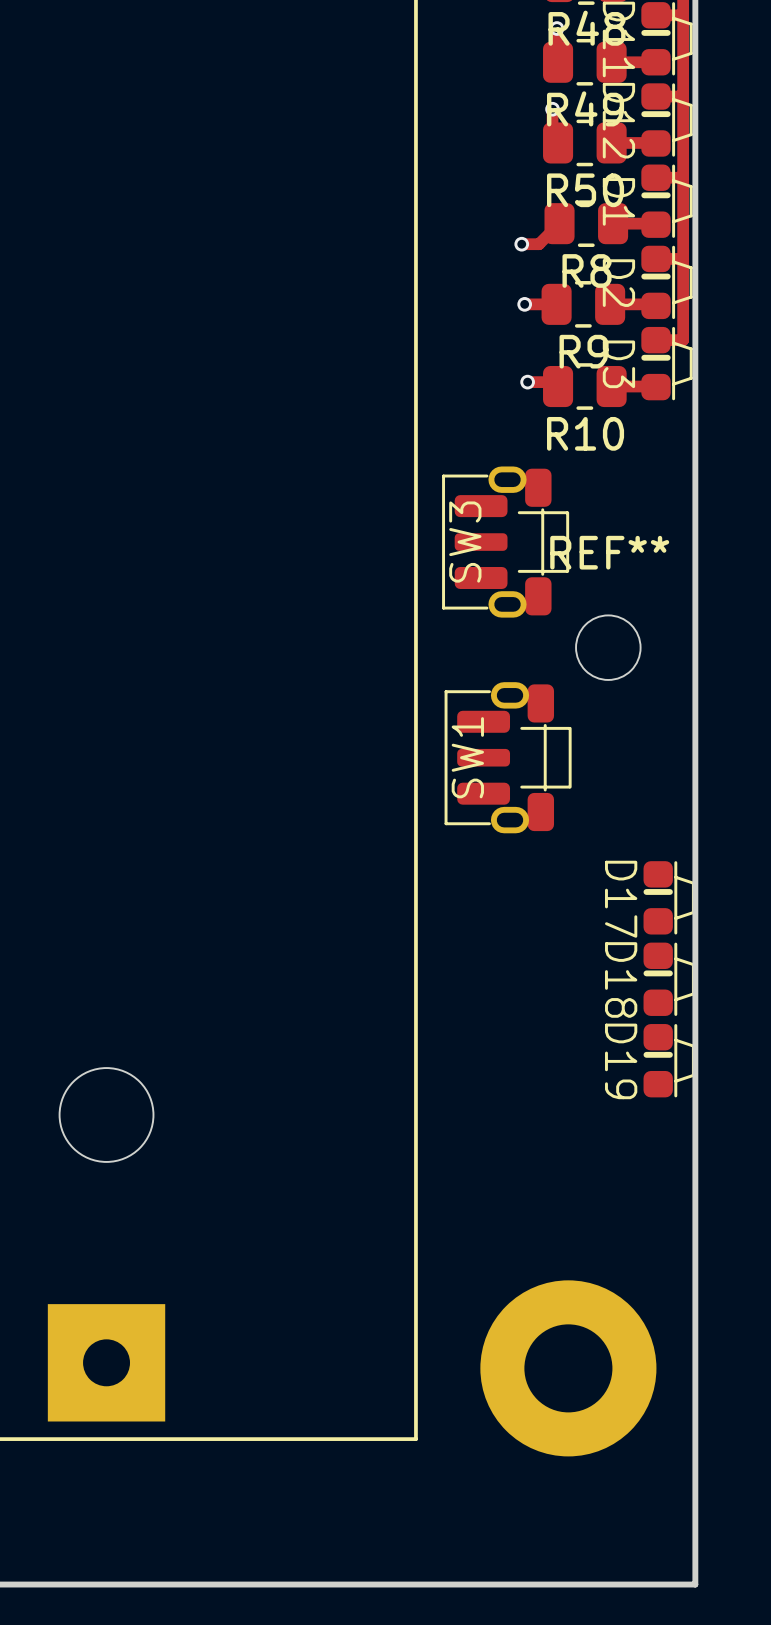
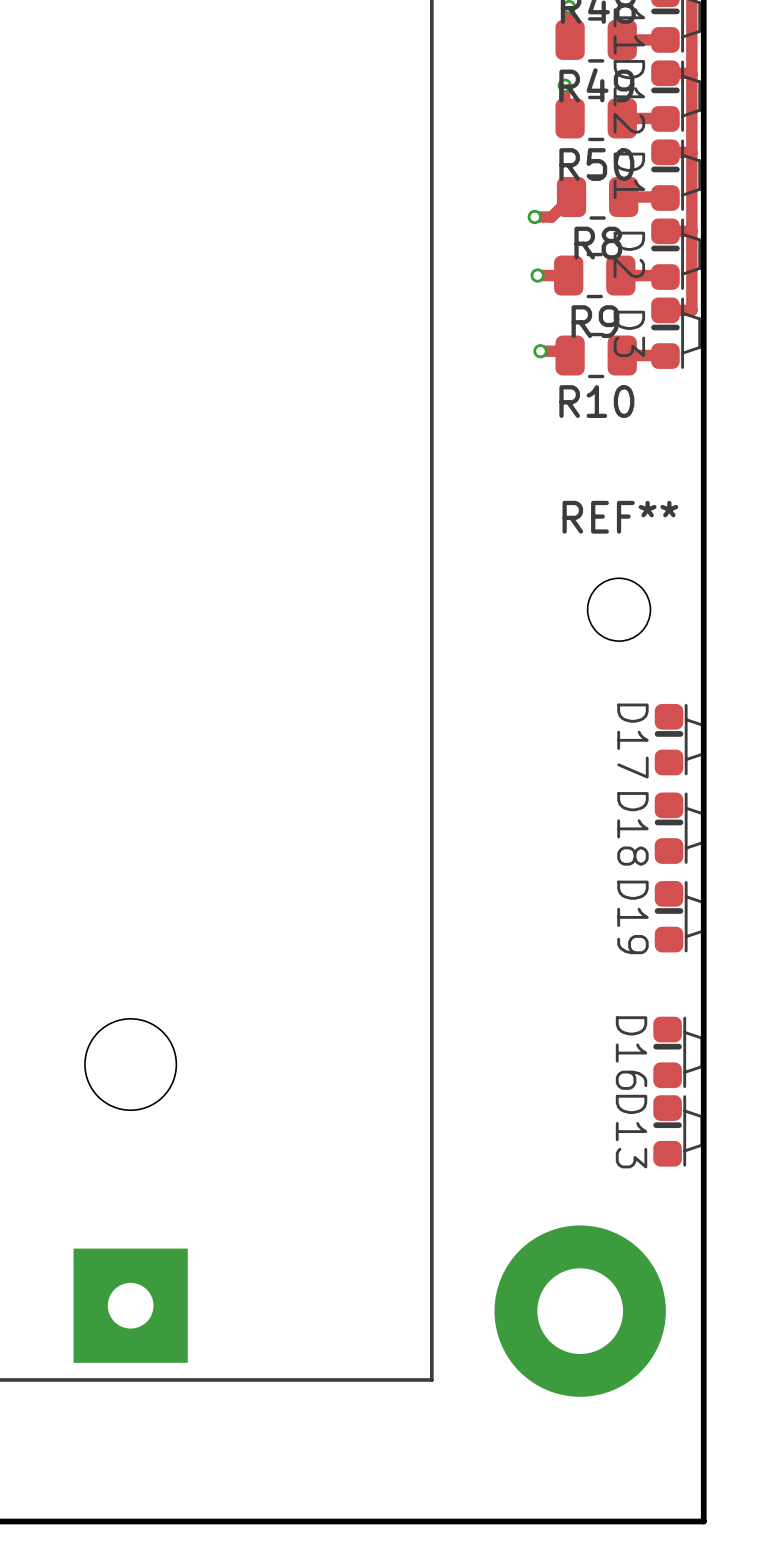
SW3: (505, 542) -> none
SW1: (508, 757) -> none
D17 position: (669, 897) -> (679, 739)
D18 position: (669, 979) -> (679, 828)
D19 position: (669, 1060) -> (679, 916)
D16: none -> (678, 1052)
D13: none -> (678, 1130)

